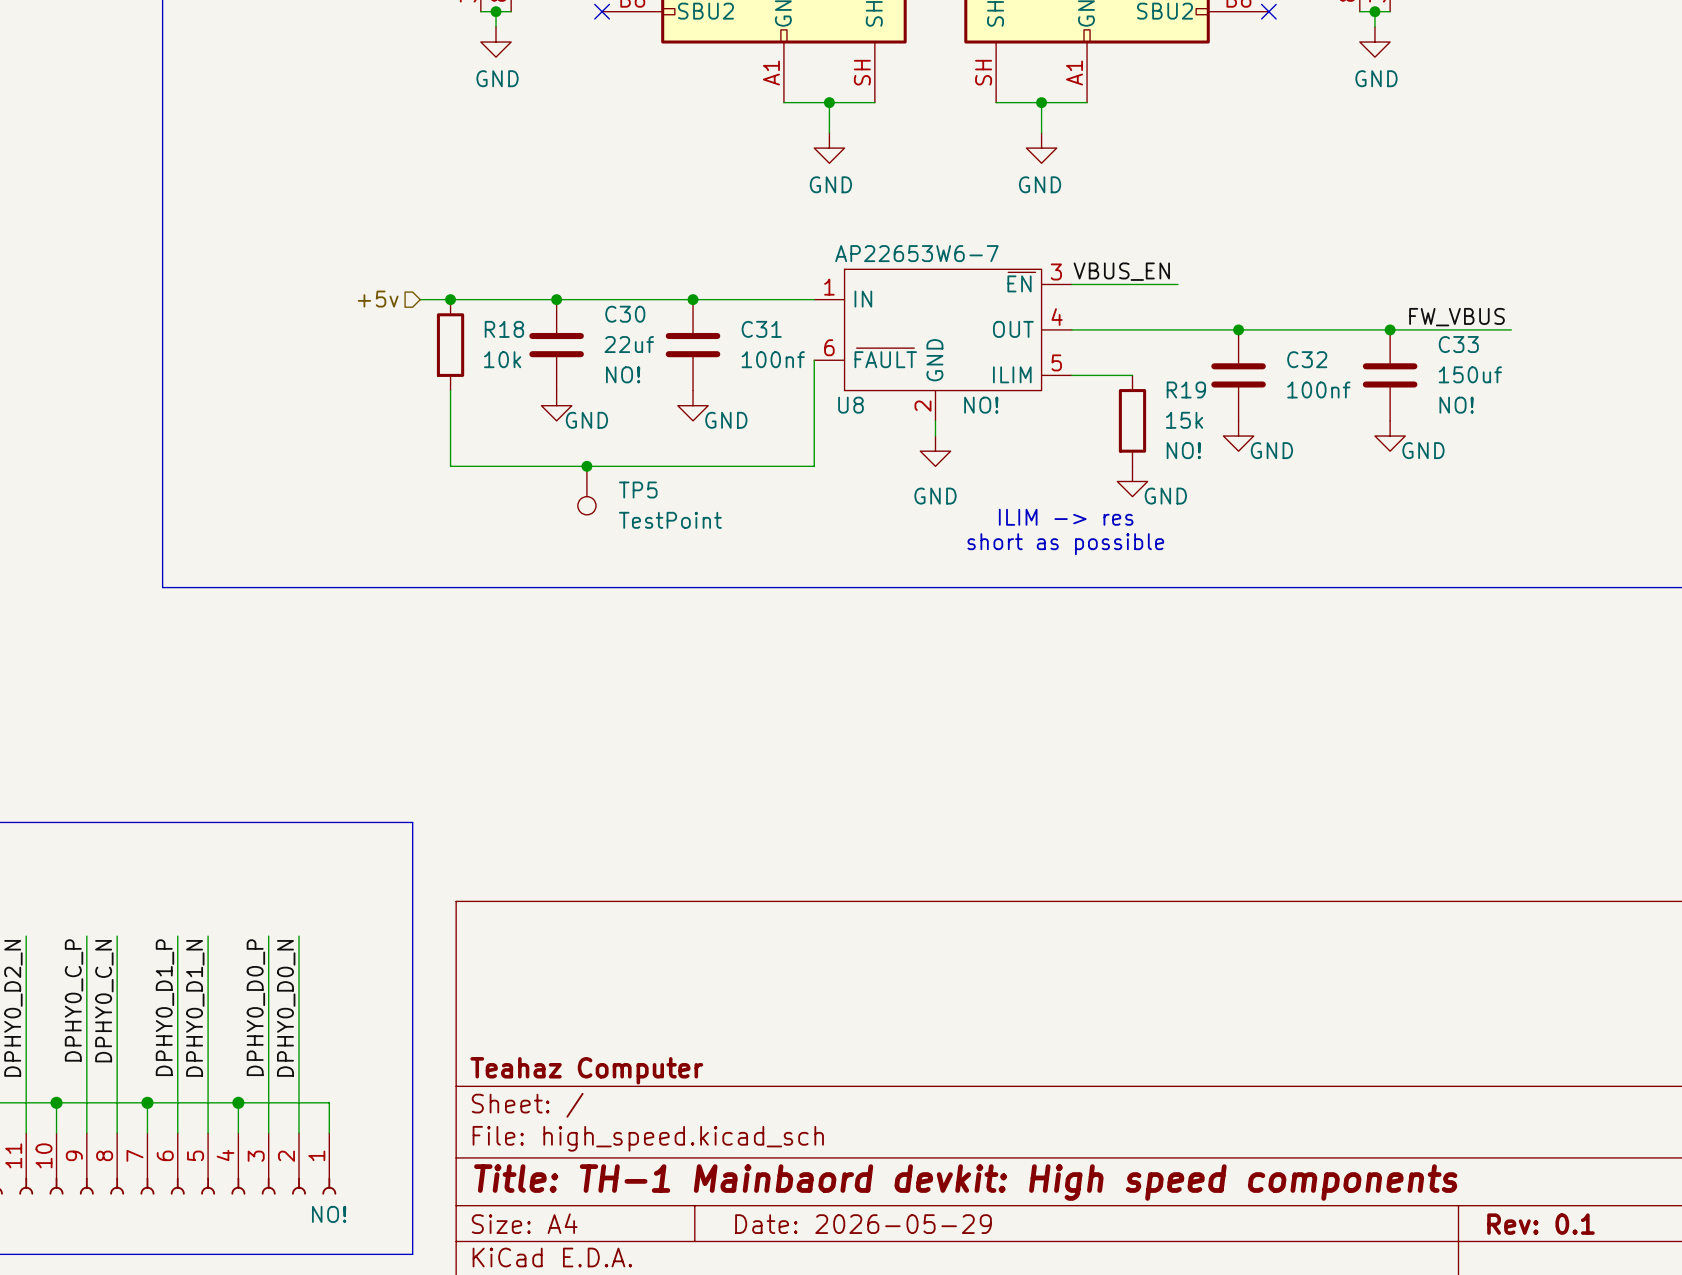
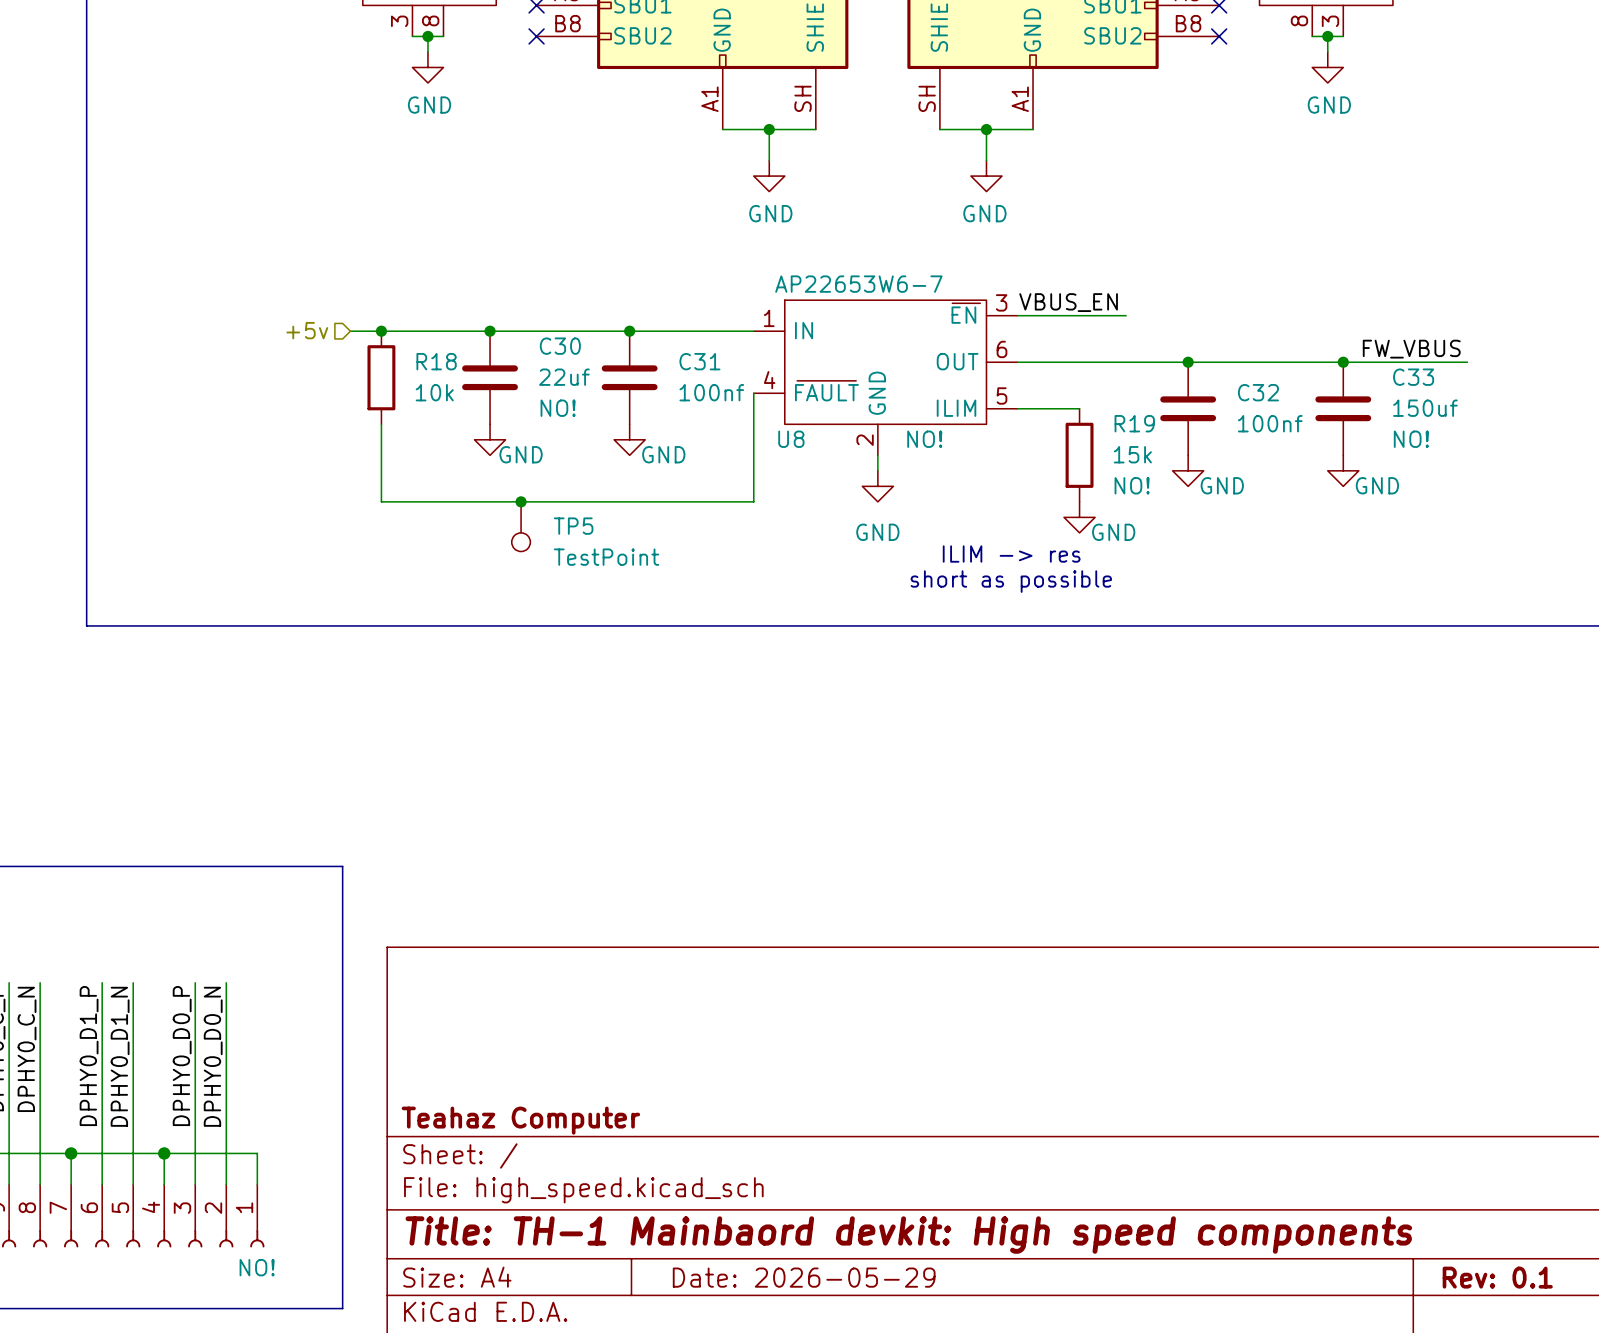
U8 pin number: 4 (1057, 317) -> 6 (1001, 349)
U8 pin number: 6 (829, 347) -> 4 (769, 380)

